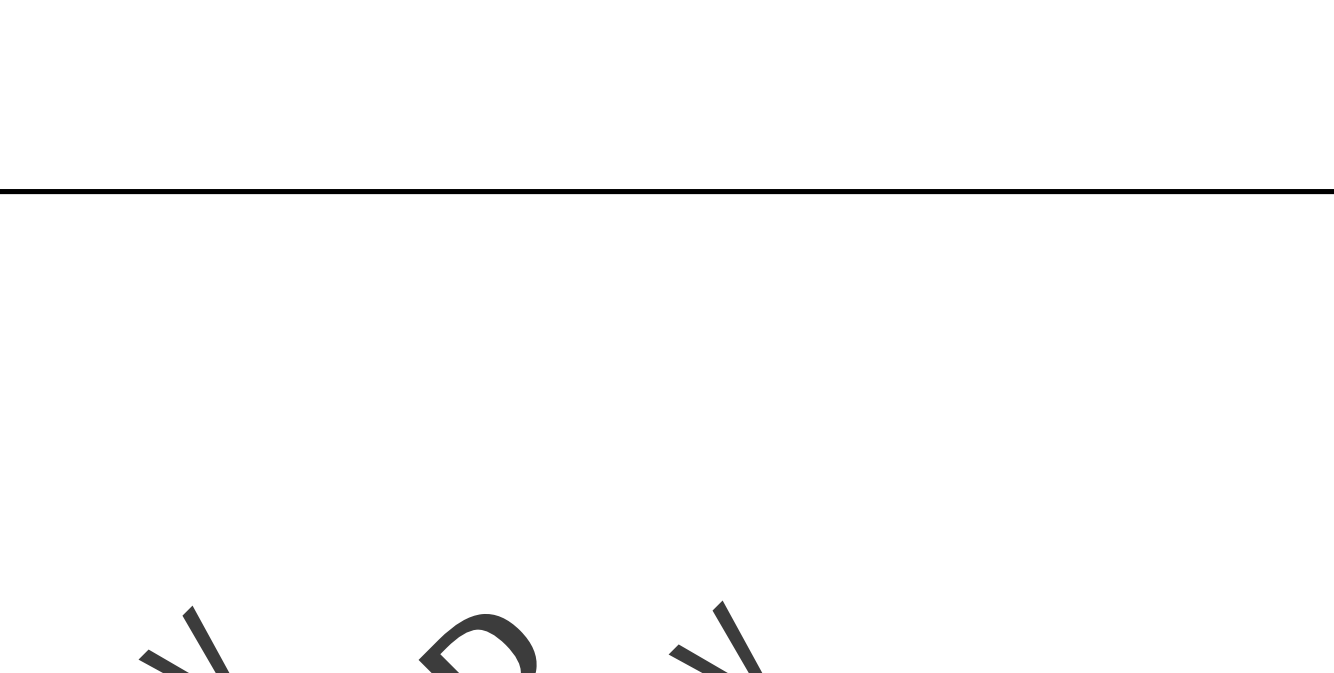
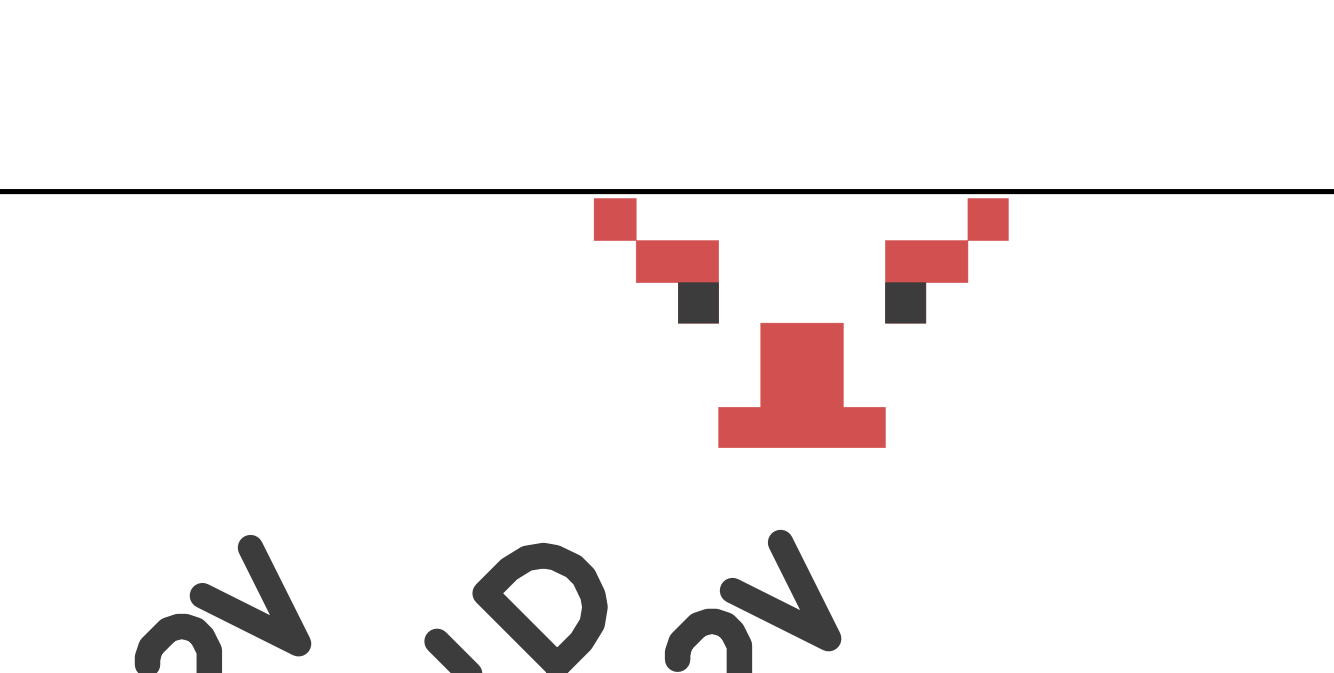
drawing: none -> [593, 198, 1009, 448]

